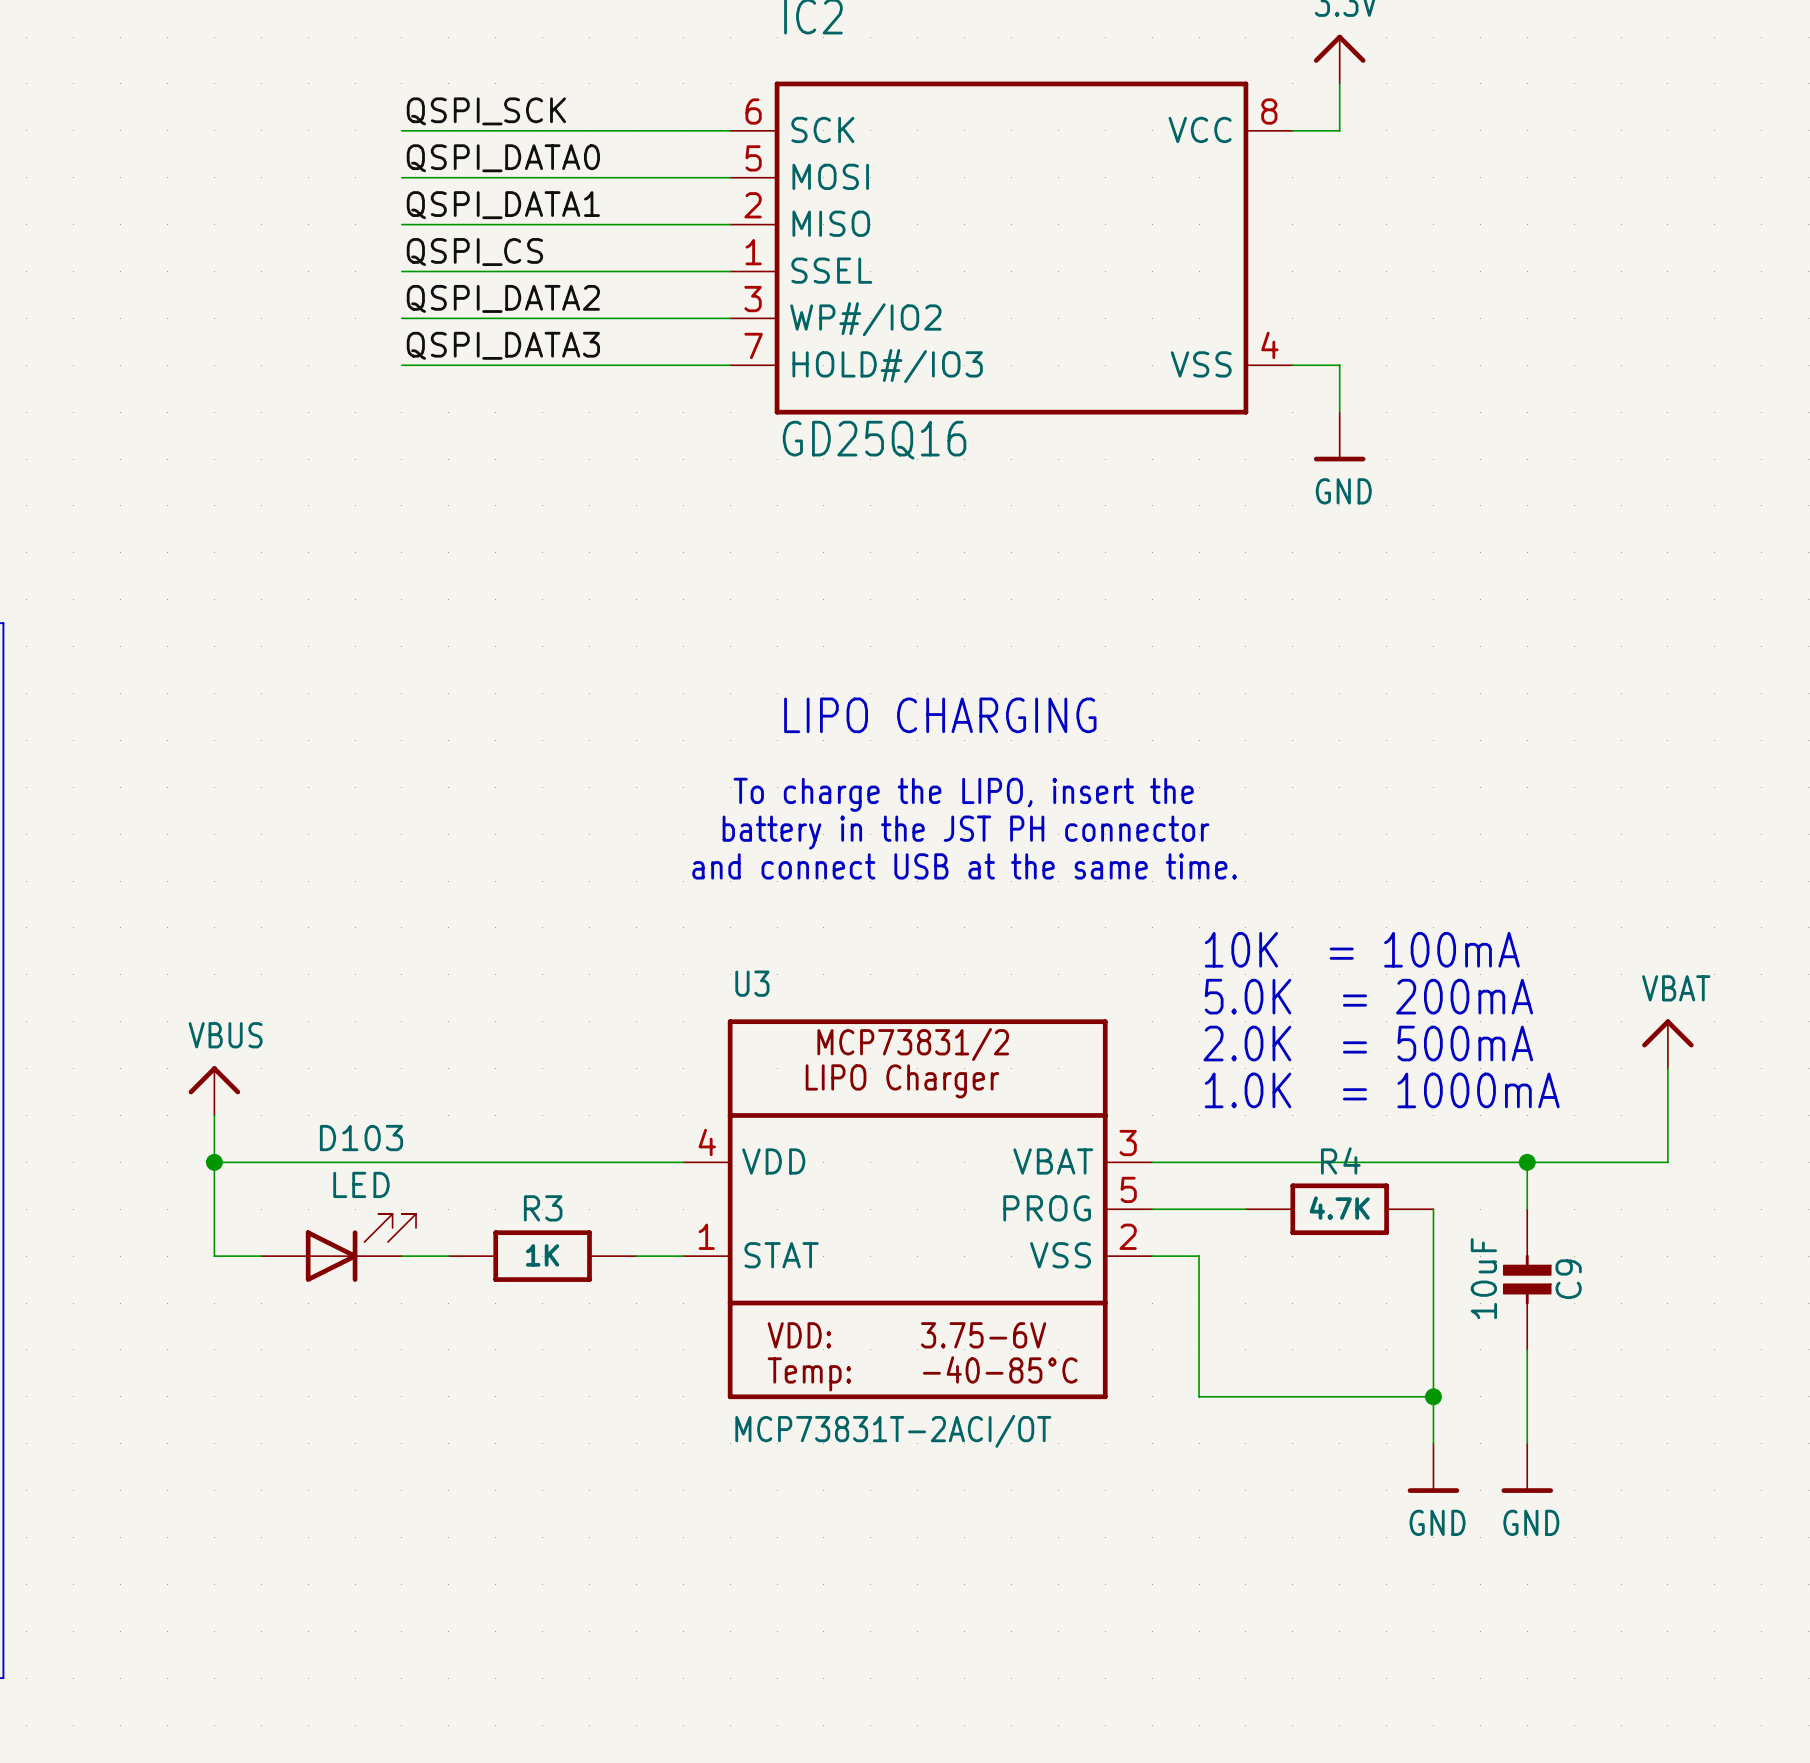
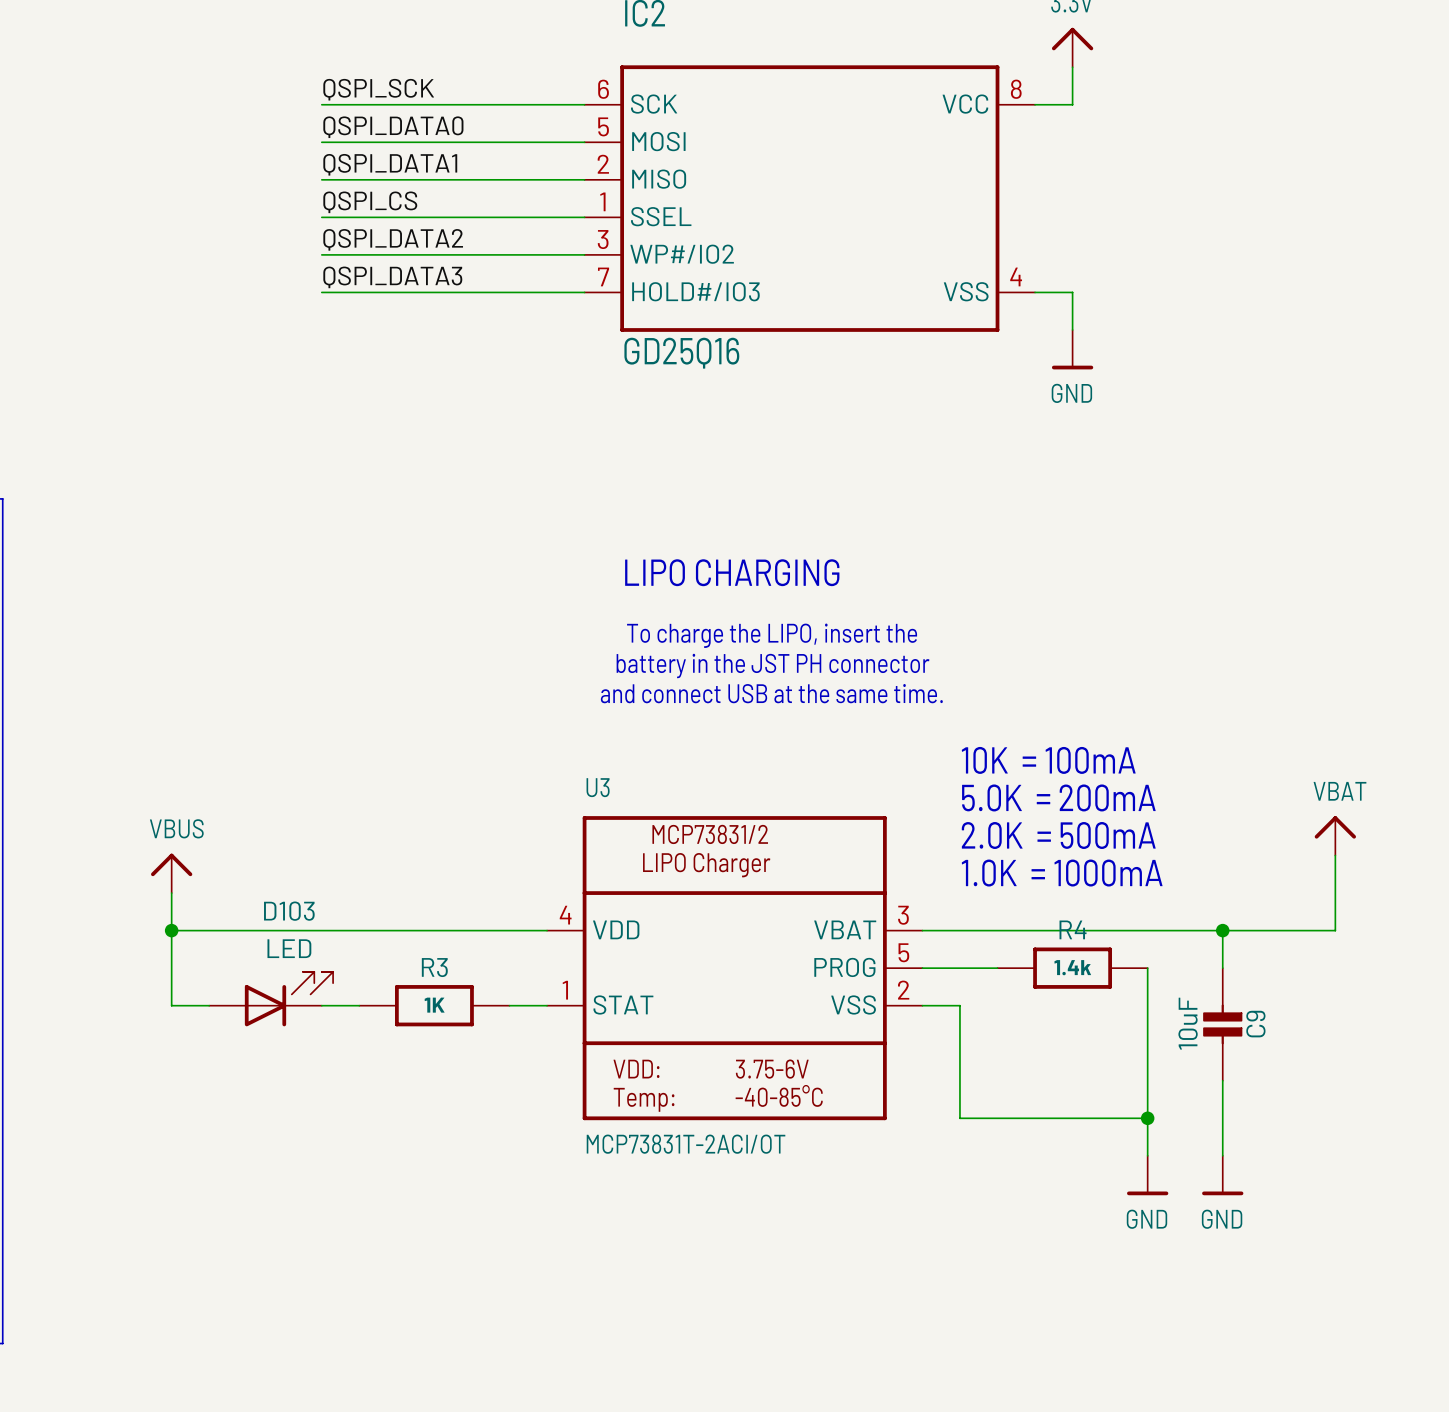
R4 value: 4.7K (1339, 1208) -> 1.4k (1072, 967)

